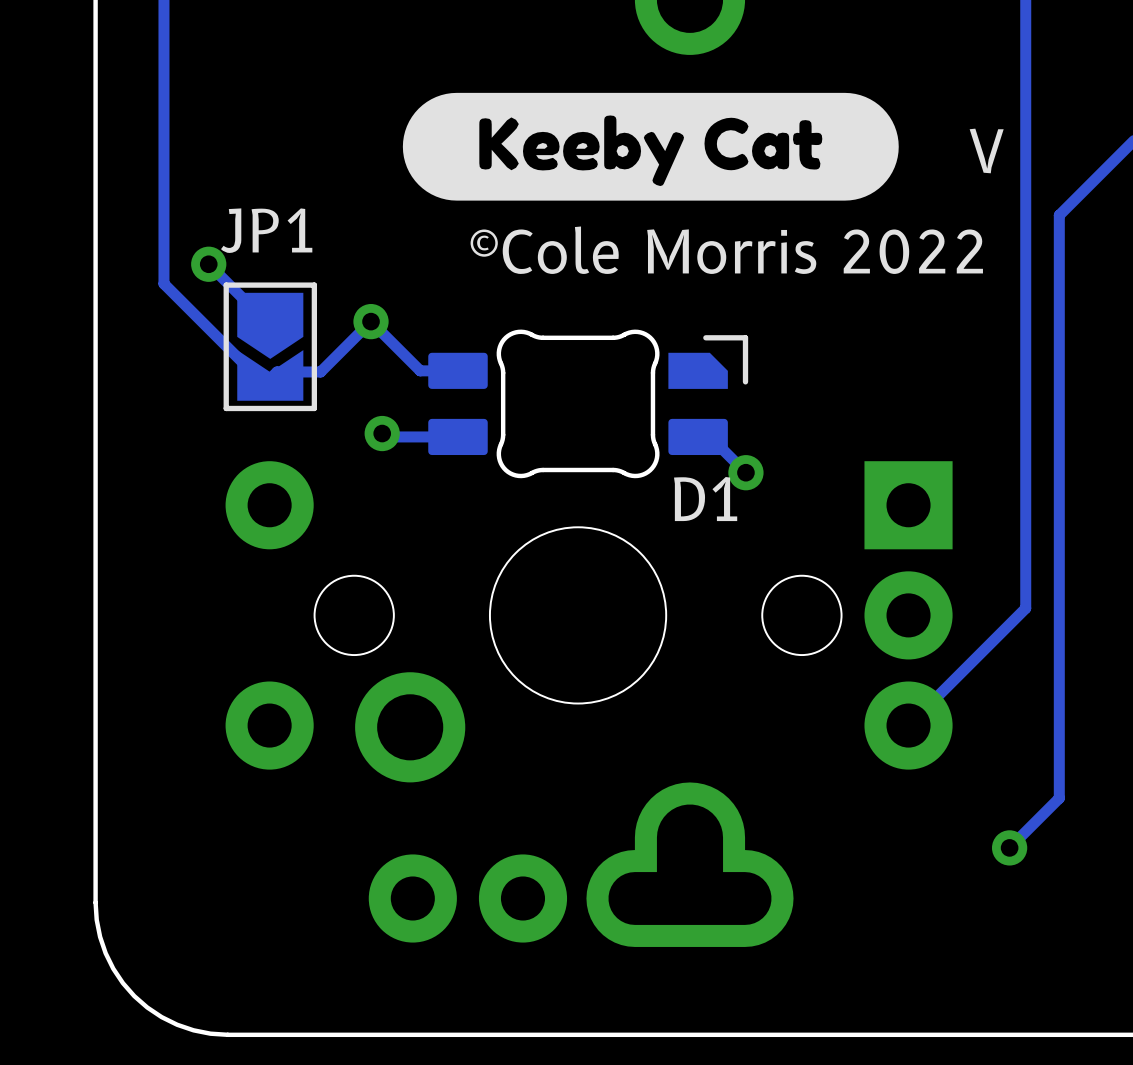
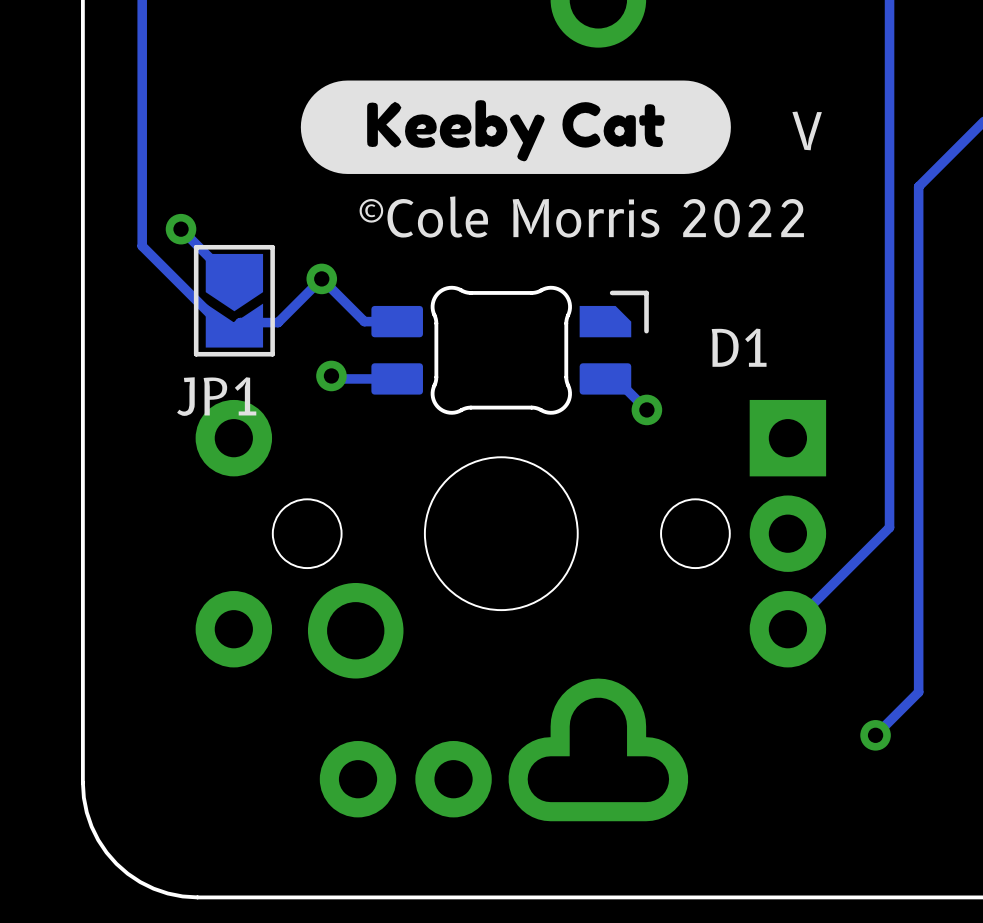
drawing position: (650, 146) -> (515, 127)
text position: V (986, 150) -> V (807, 130)
JP1 name position: JP1 (266, 230) -> JP1 (216, 396)
text position: ©Cole Morris 2022 (726, 250) -> ©Cole Morris 2022 (581, 216)
D1 name position: D1 (705, 499) -> D1 (739, 347)

